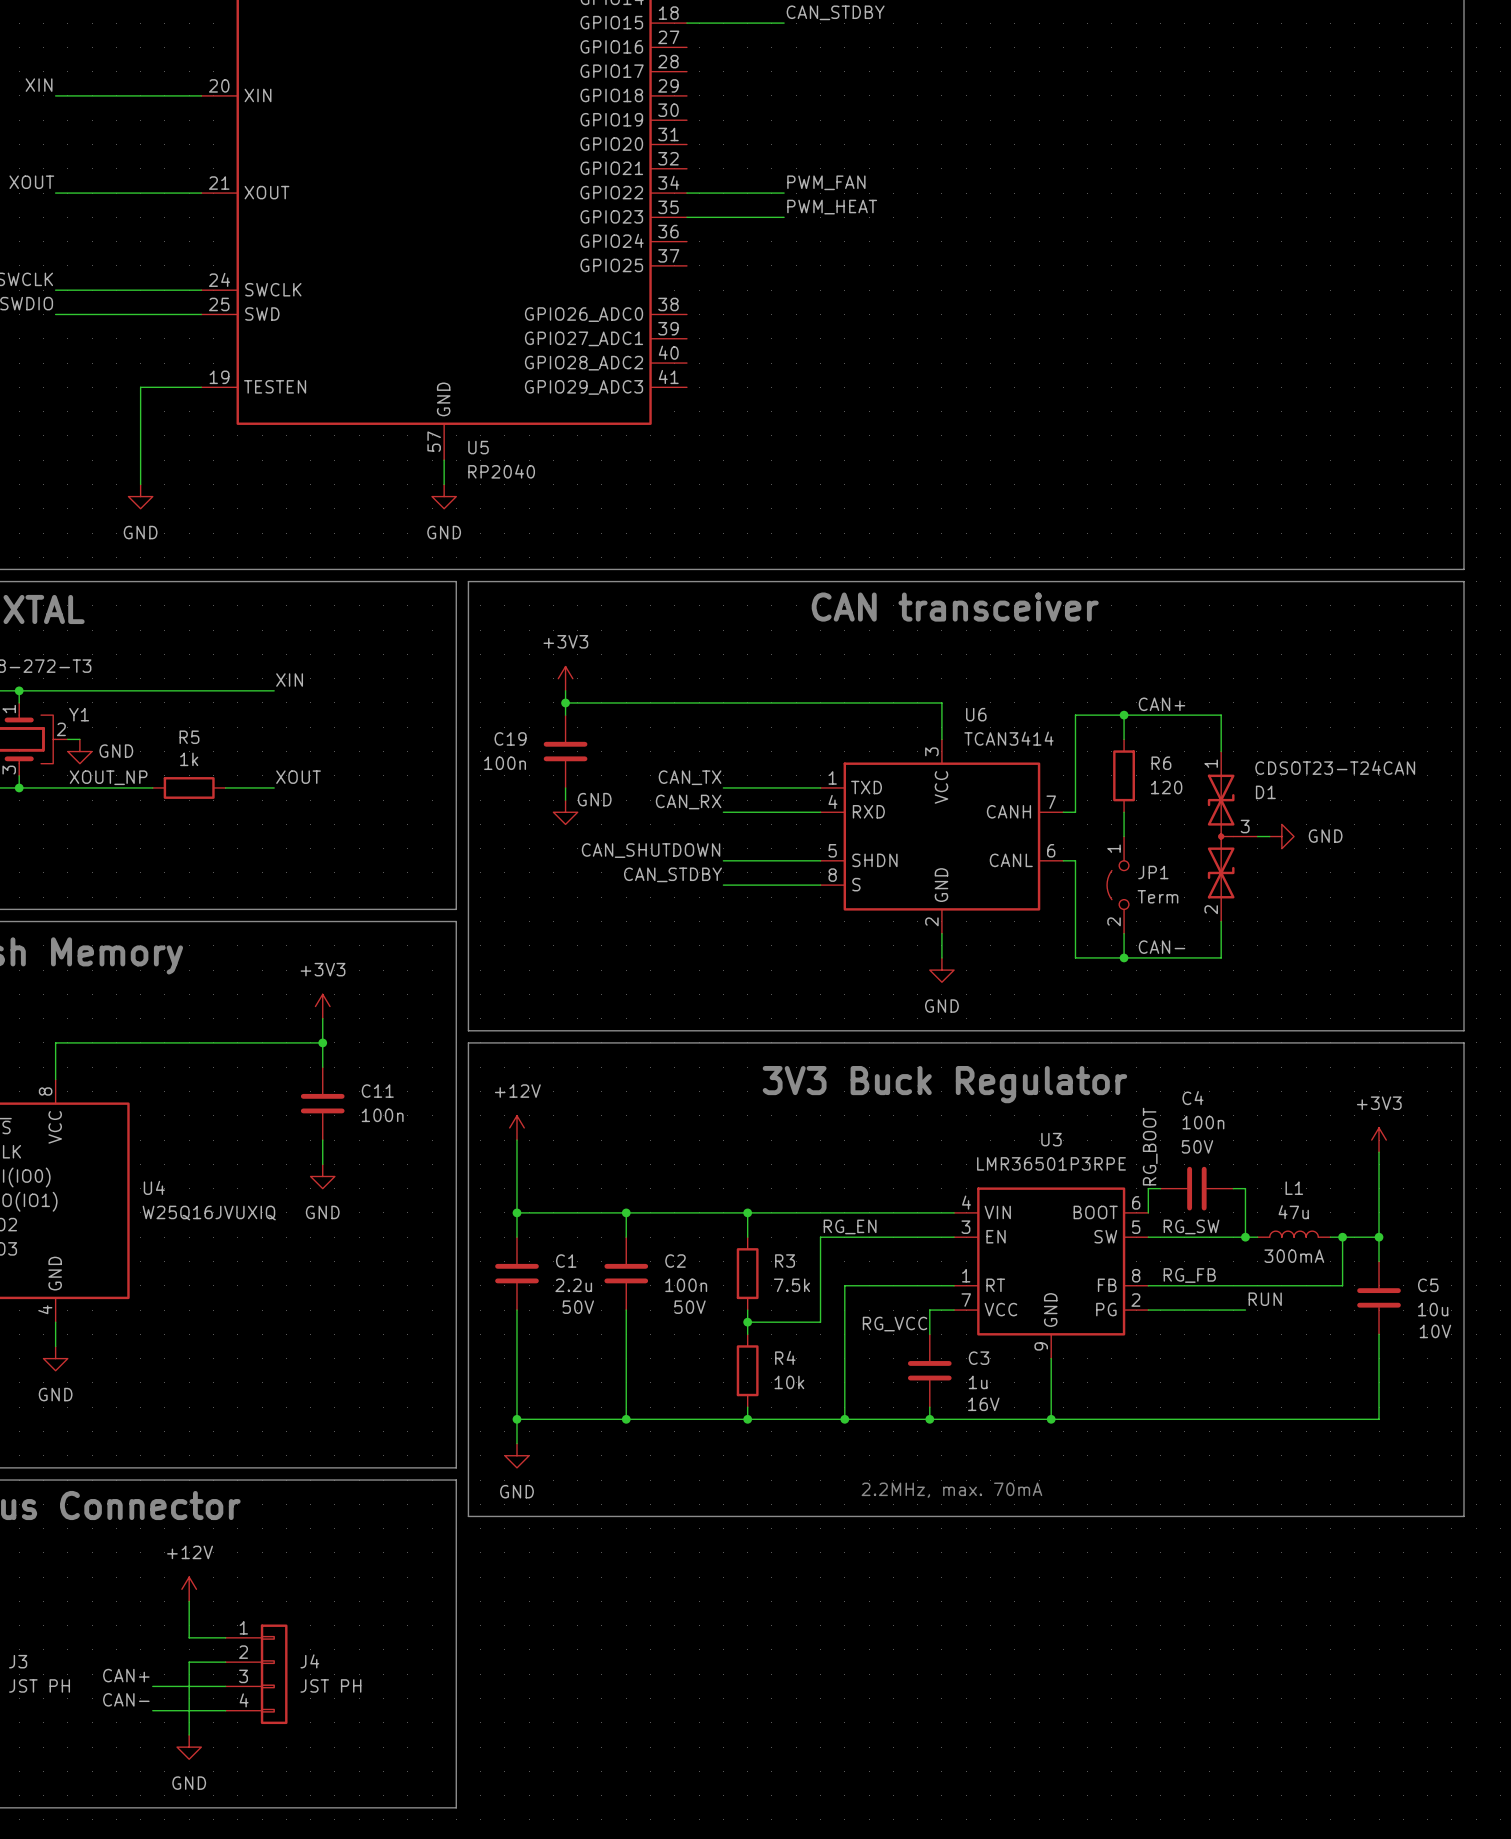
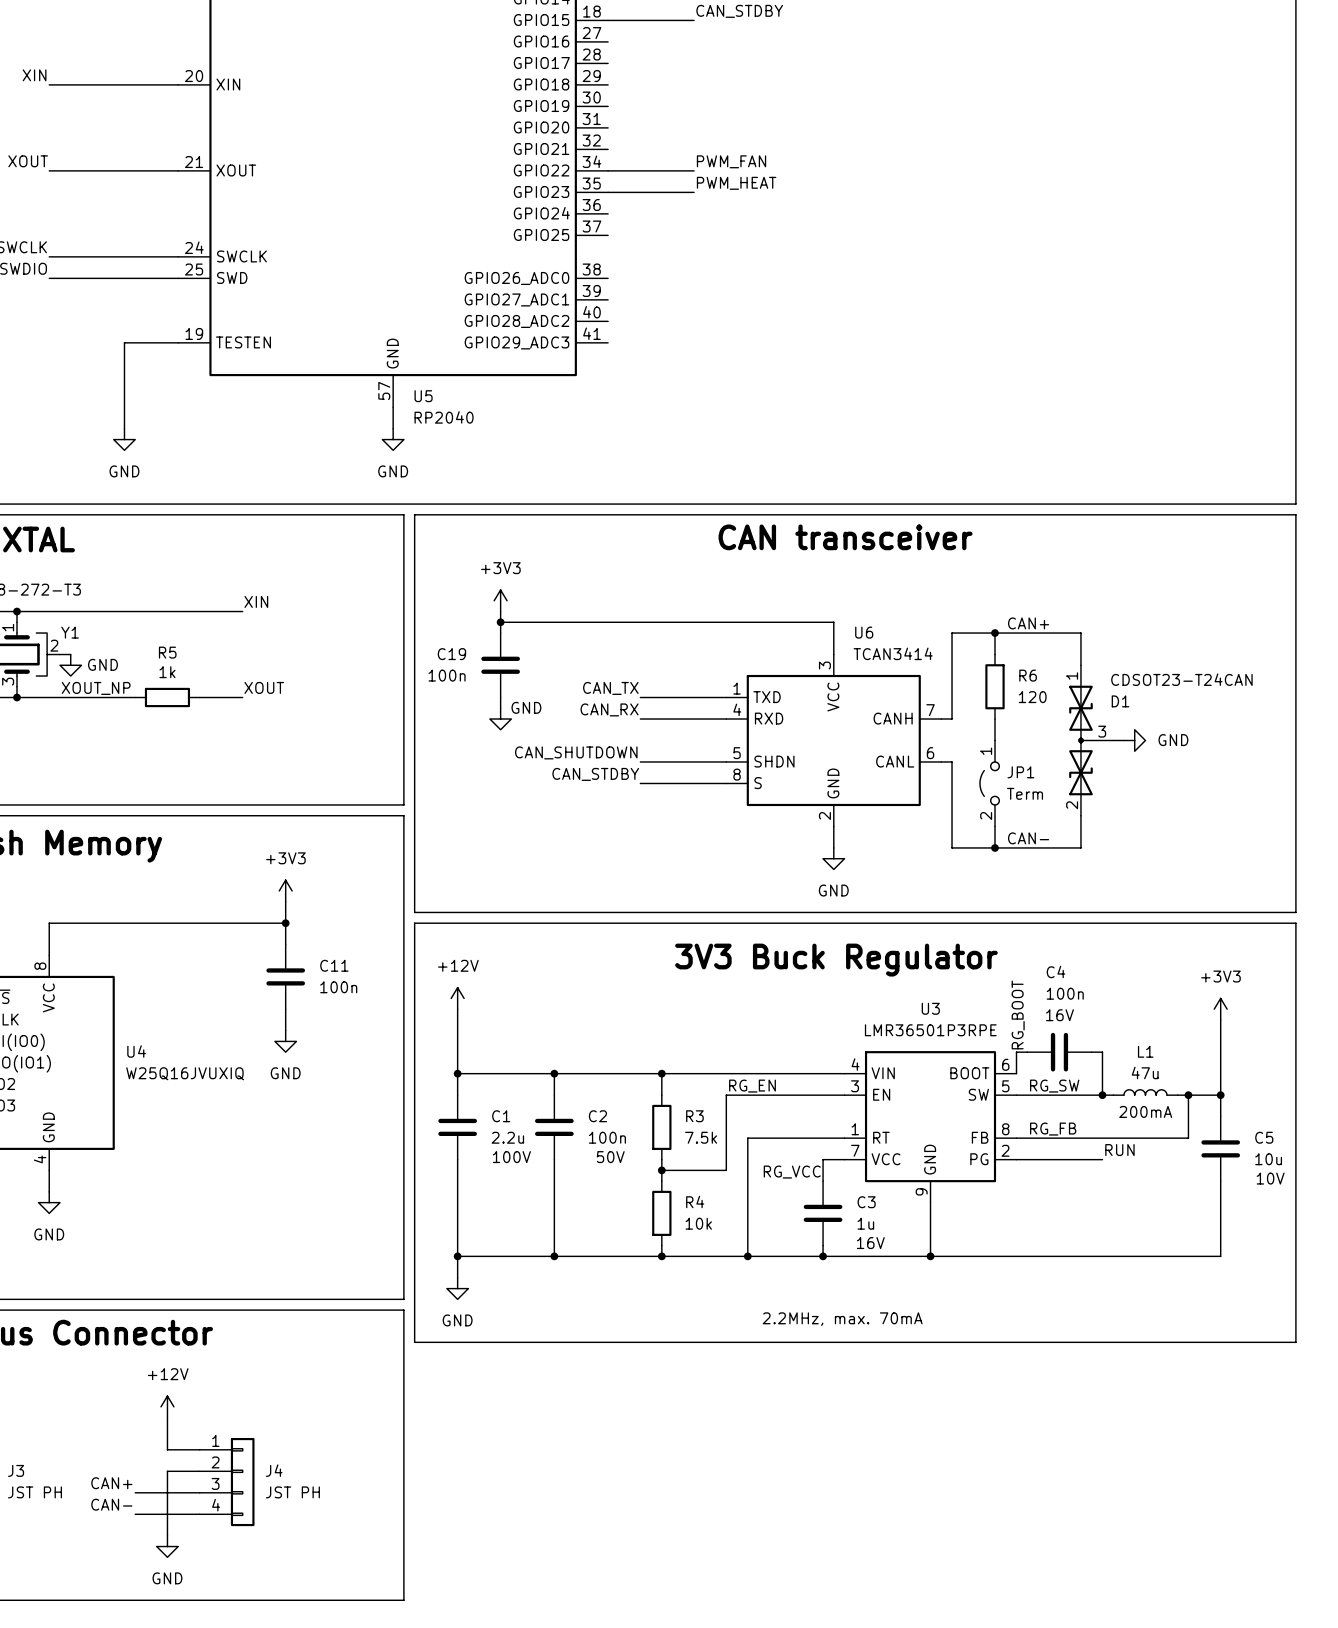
C4 text: 50V (1197, 1146) -> 16V (1059, 1015)
L1 text: 300mA (1294, 1256) -> 200mA (1145, 1111)
C1 text: 50V (578, 1307) -> 100V (511, 1157)

